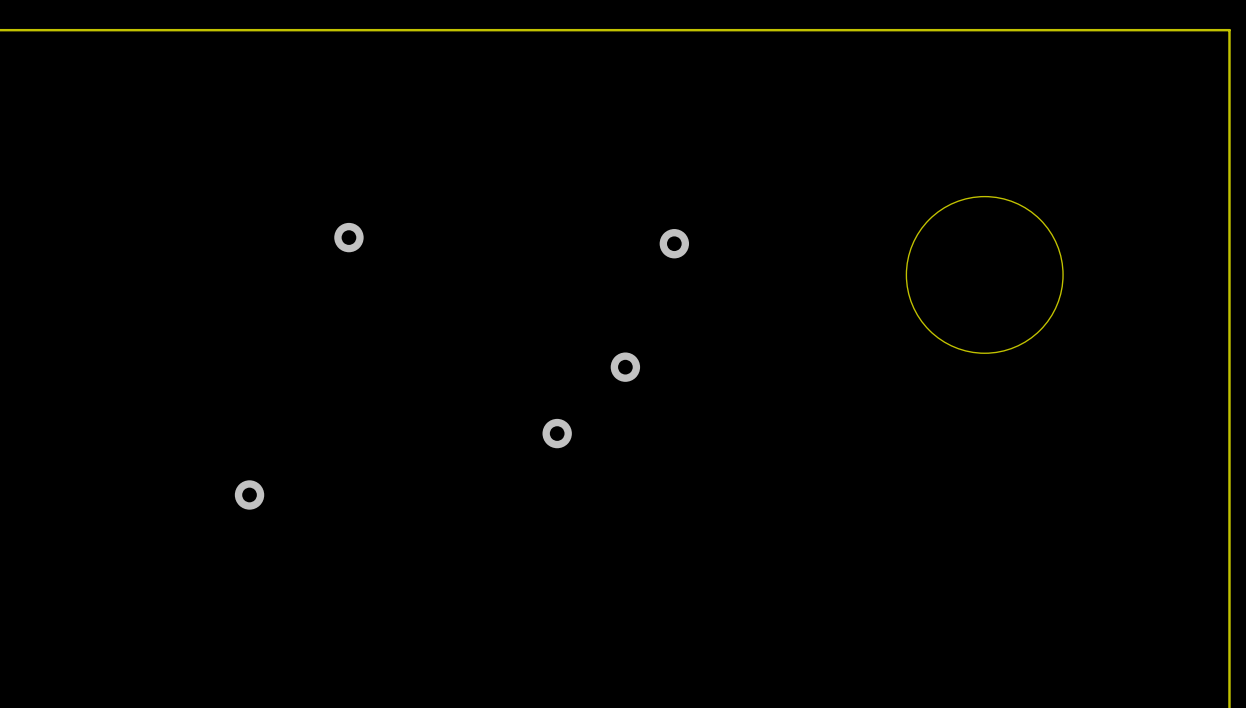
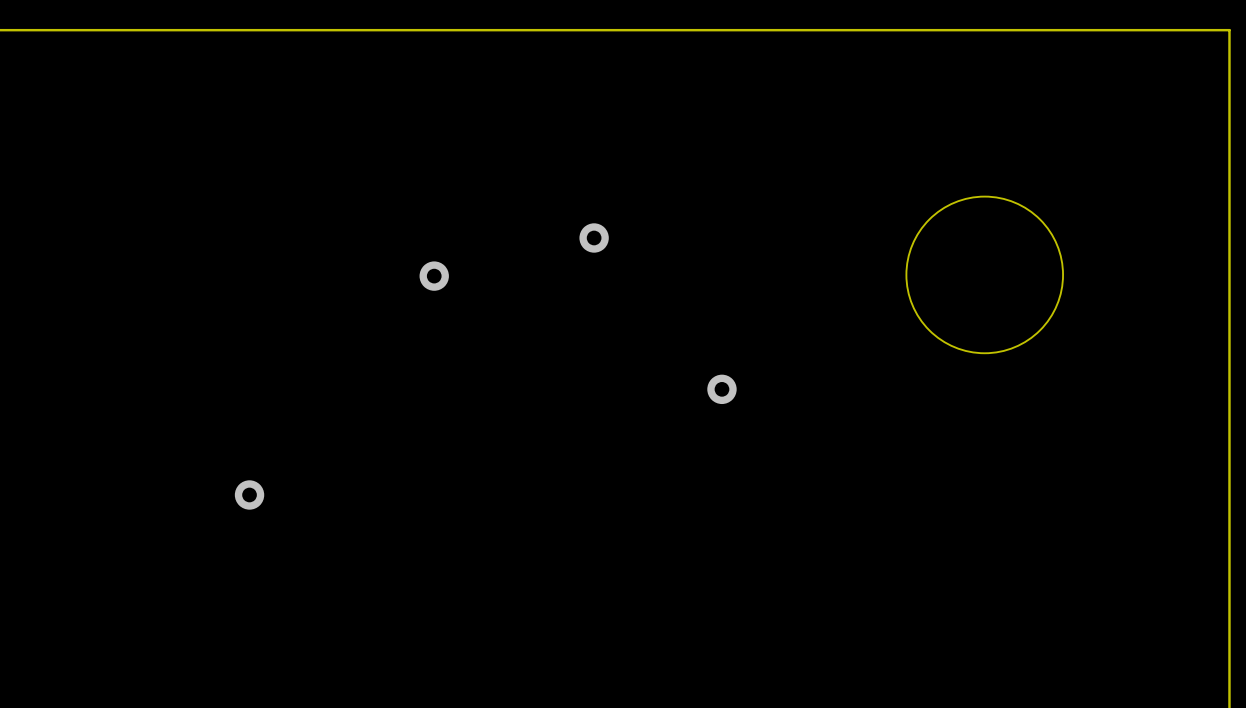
via position: (348, 237) -> (434, 276)
via: none -> (594, 237)
via: (674, 243) -> none
via: (625, 367) -> none
via: none -> (721, 389)
via: (557, 433) -> none

